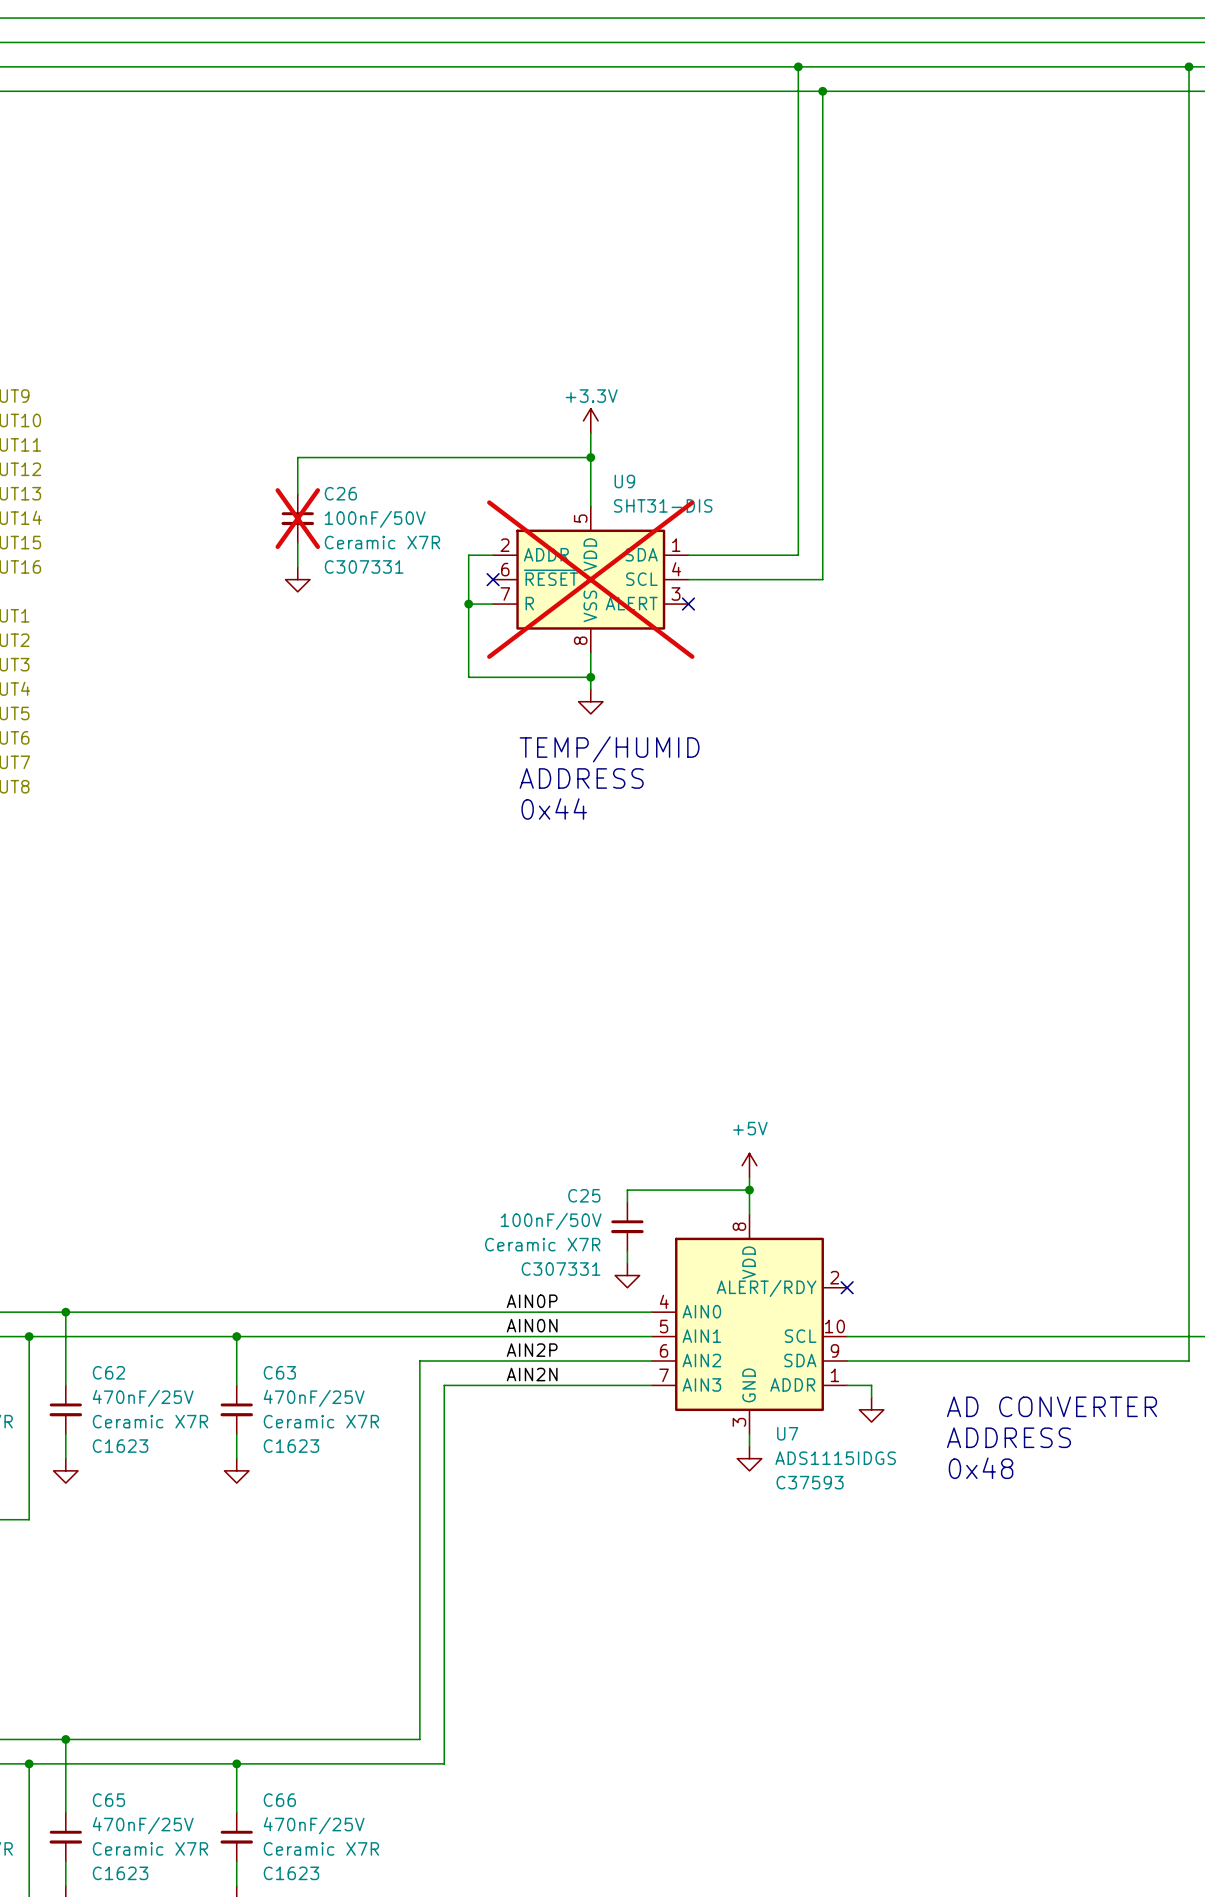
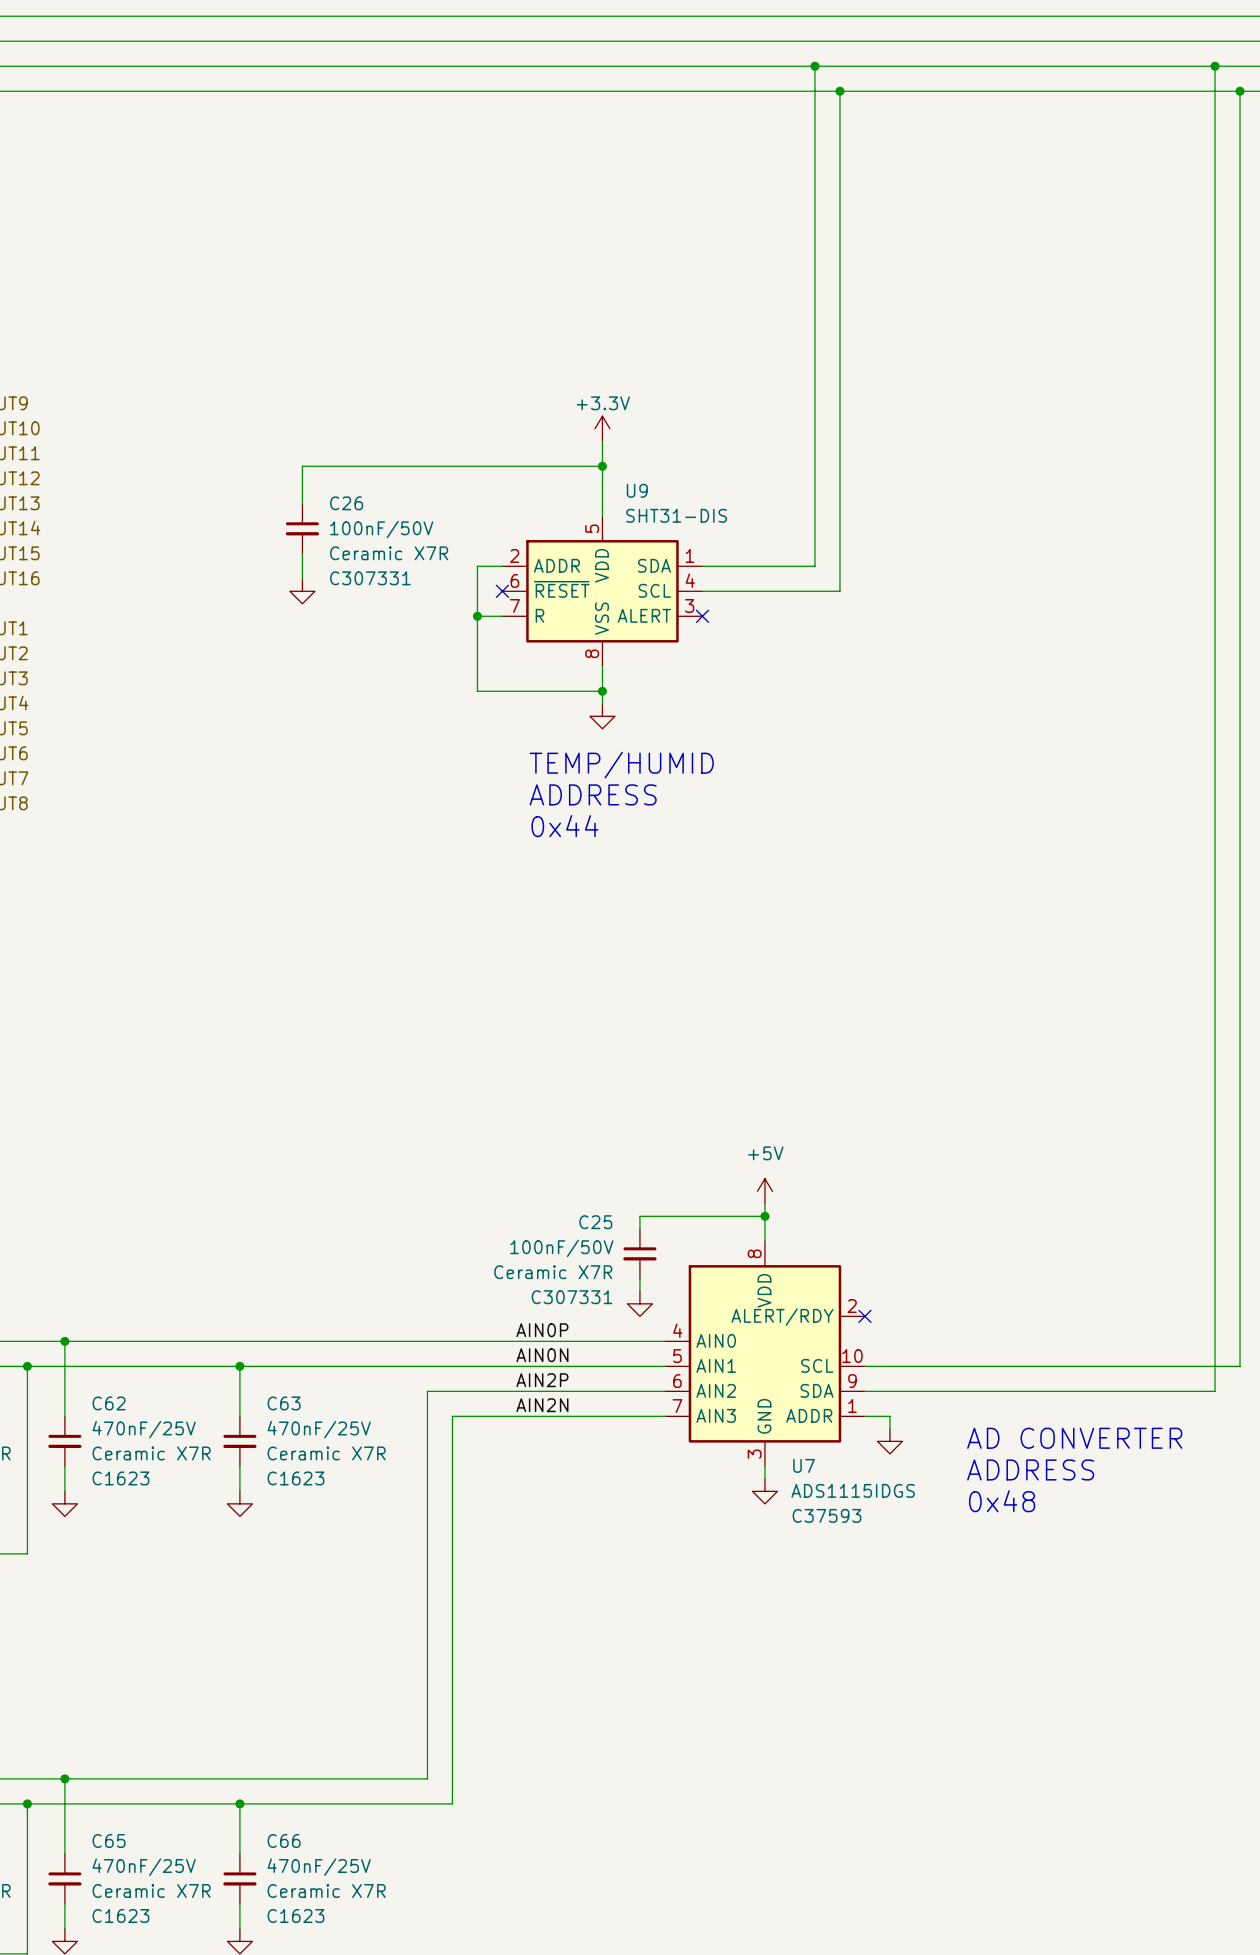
C26 do-not-place cross: (297, 518) -> none
U9 do-not-place cross: (590, 579) -> none

